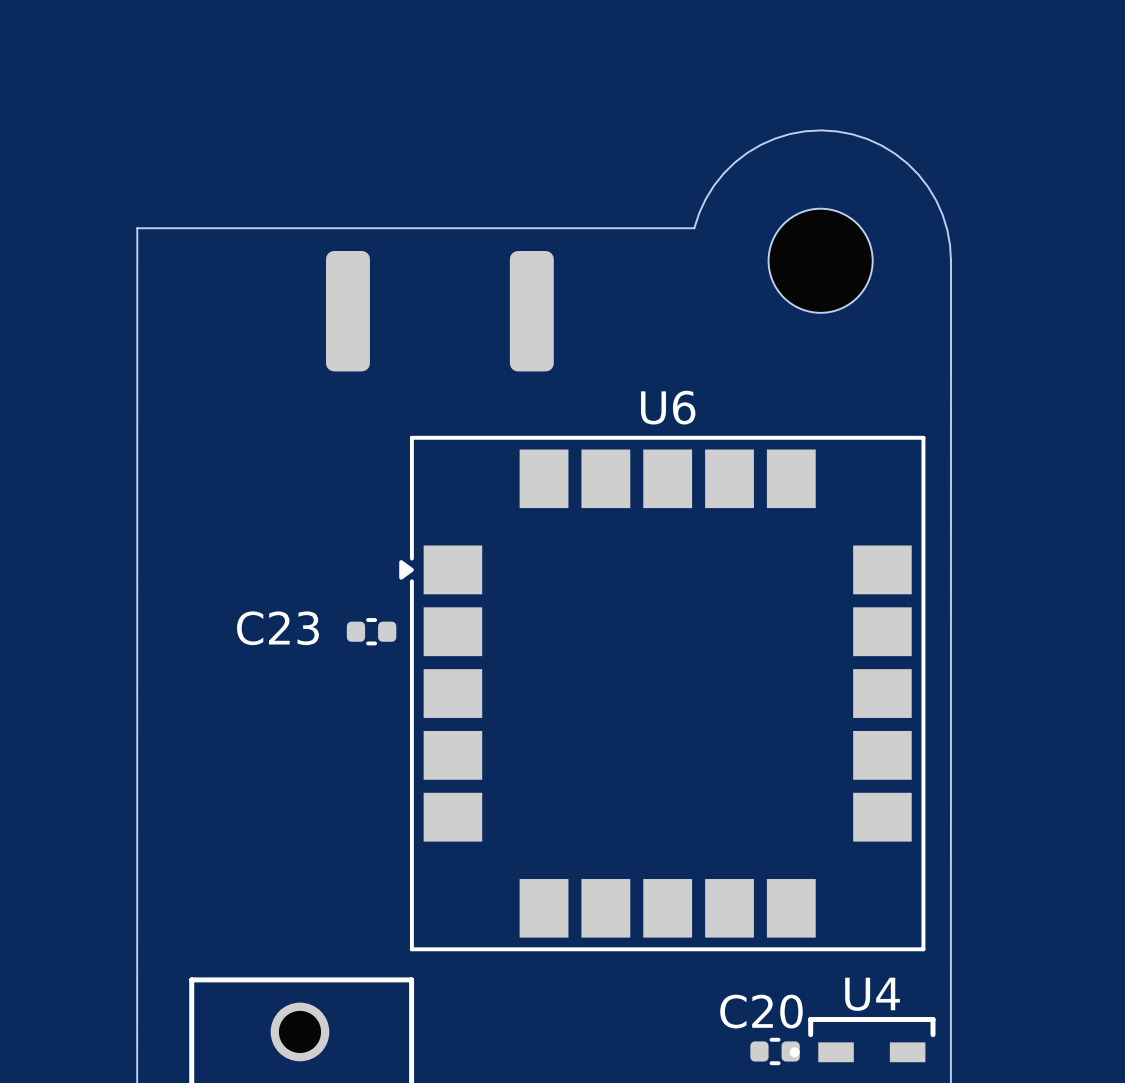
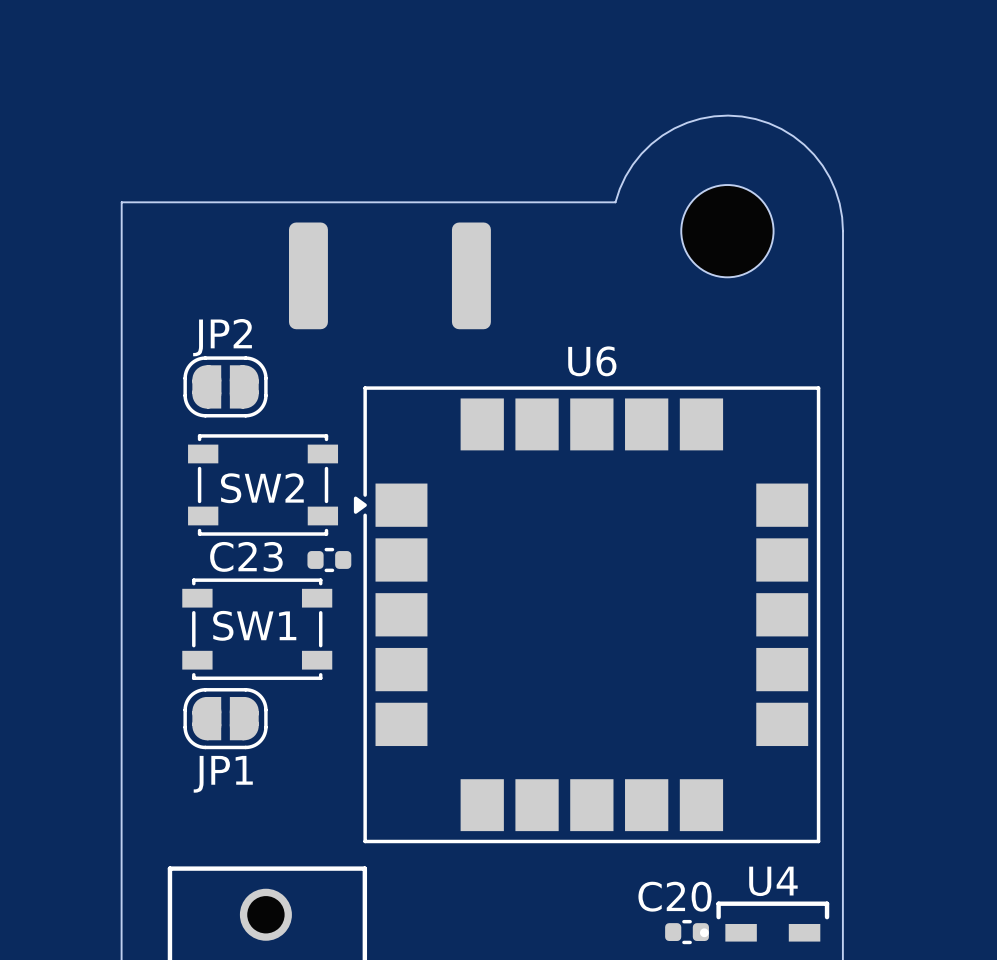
JP2: none -> (225, 386)
SW2: none -> (263, 484)
SW1: none -> (257, 629)
JP1: none -> (225, 718)

